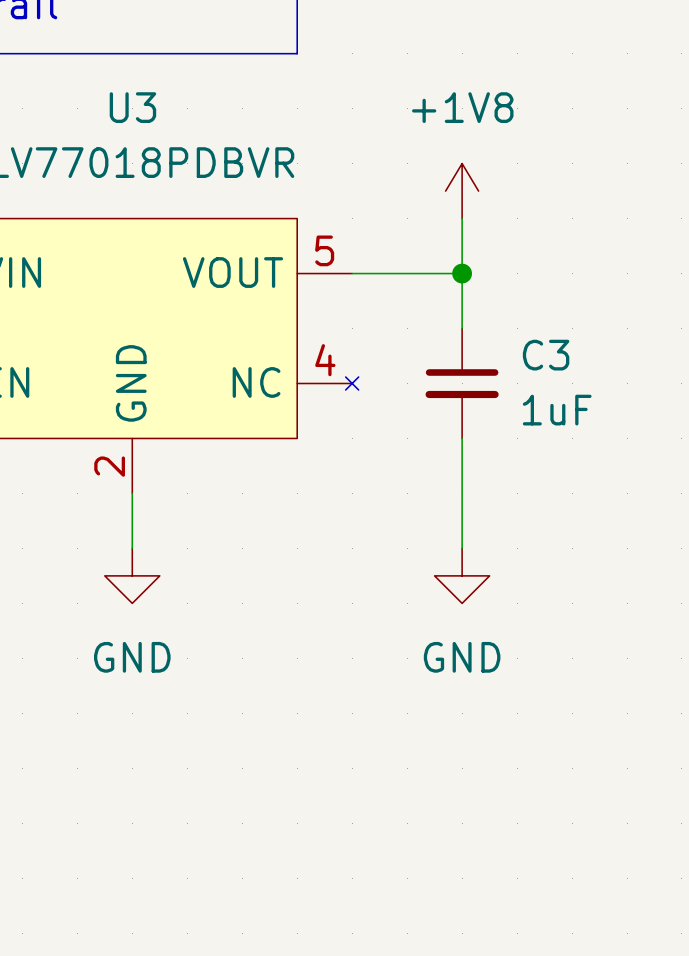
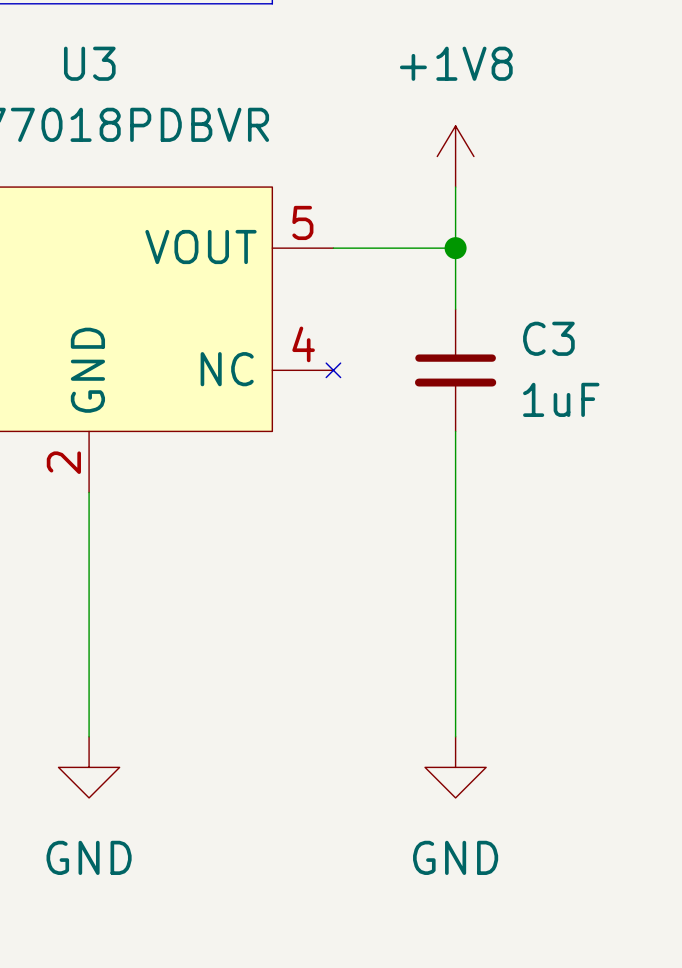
wire: none -> (89, 553) (89, 736)
wire: none -> (455, 553) (455, 736)
power symbol position: GND (132, 575) -> GND (89, 767)
power symbol position: GND (462, 575) -> GND (455, 767)

